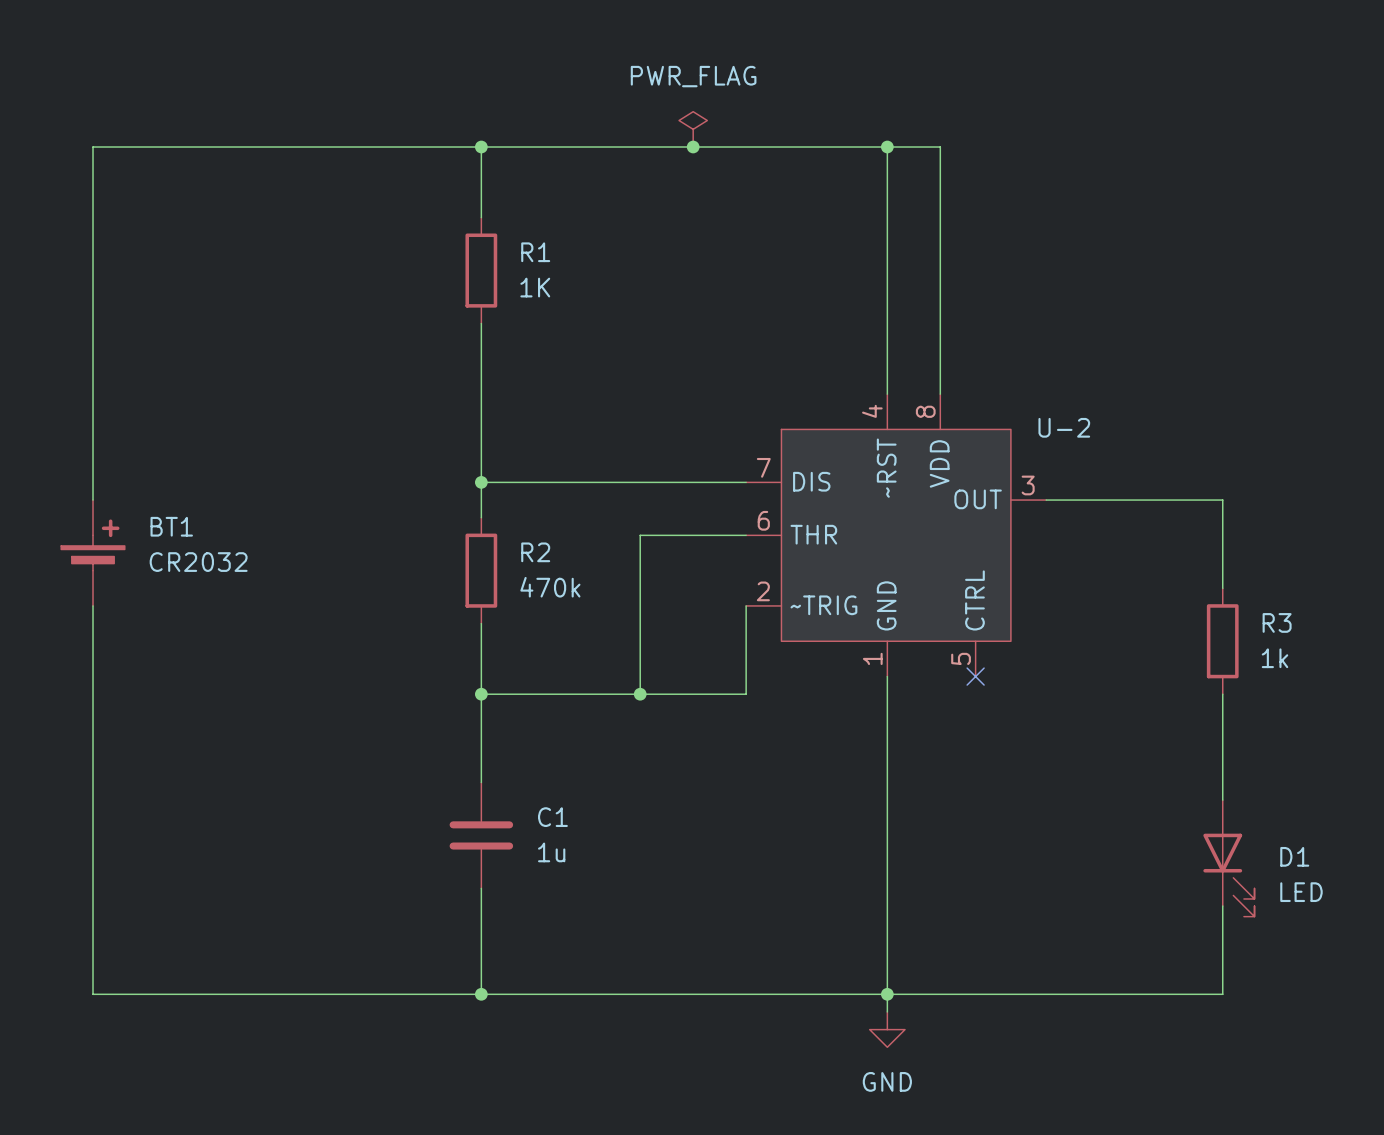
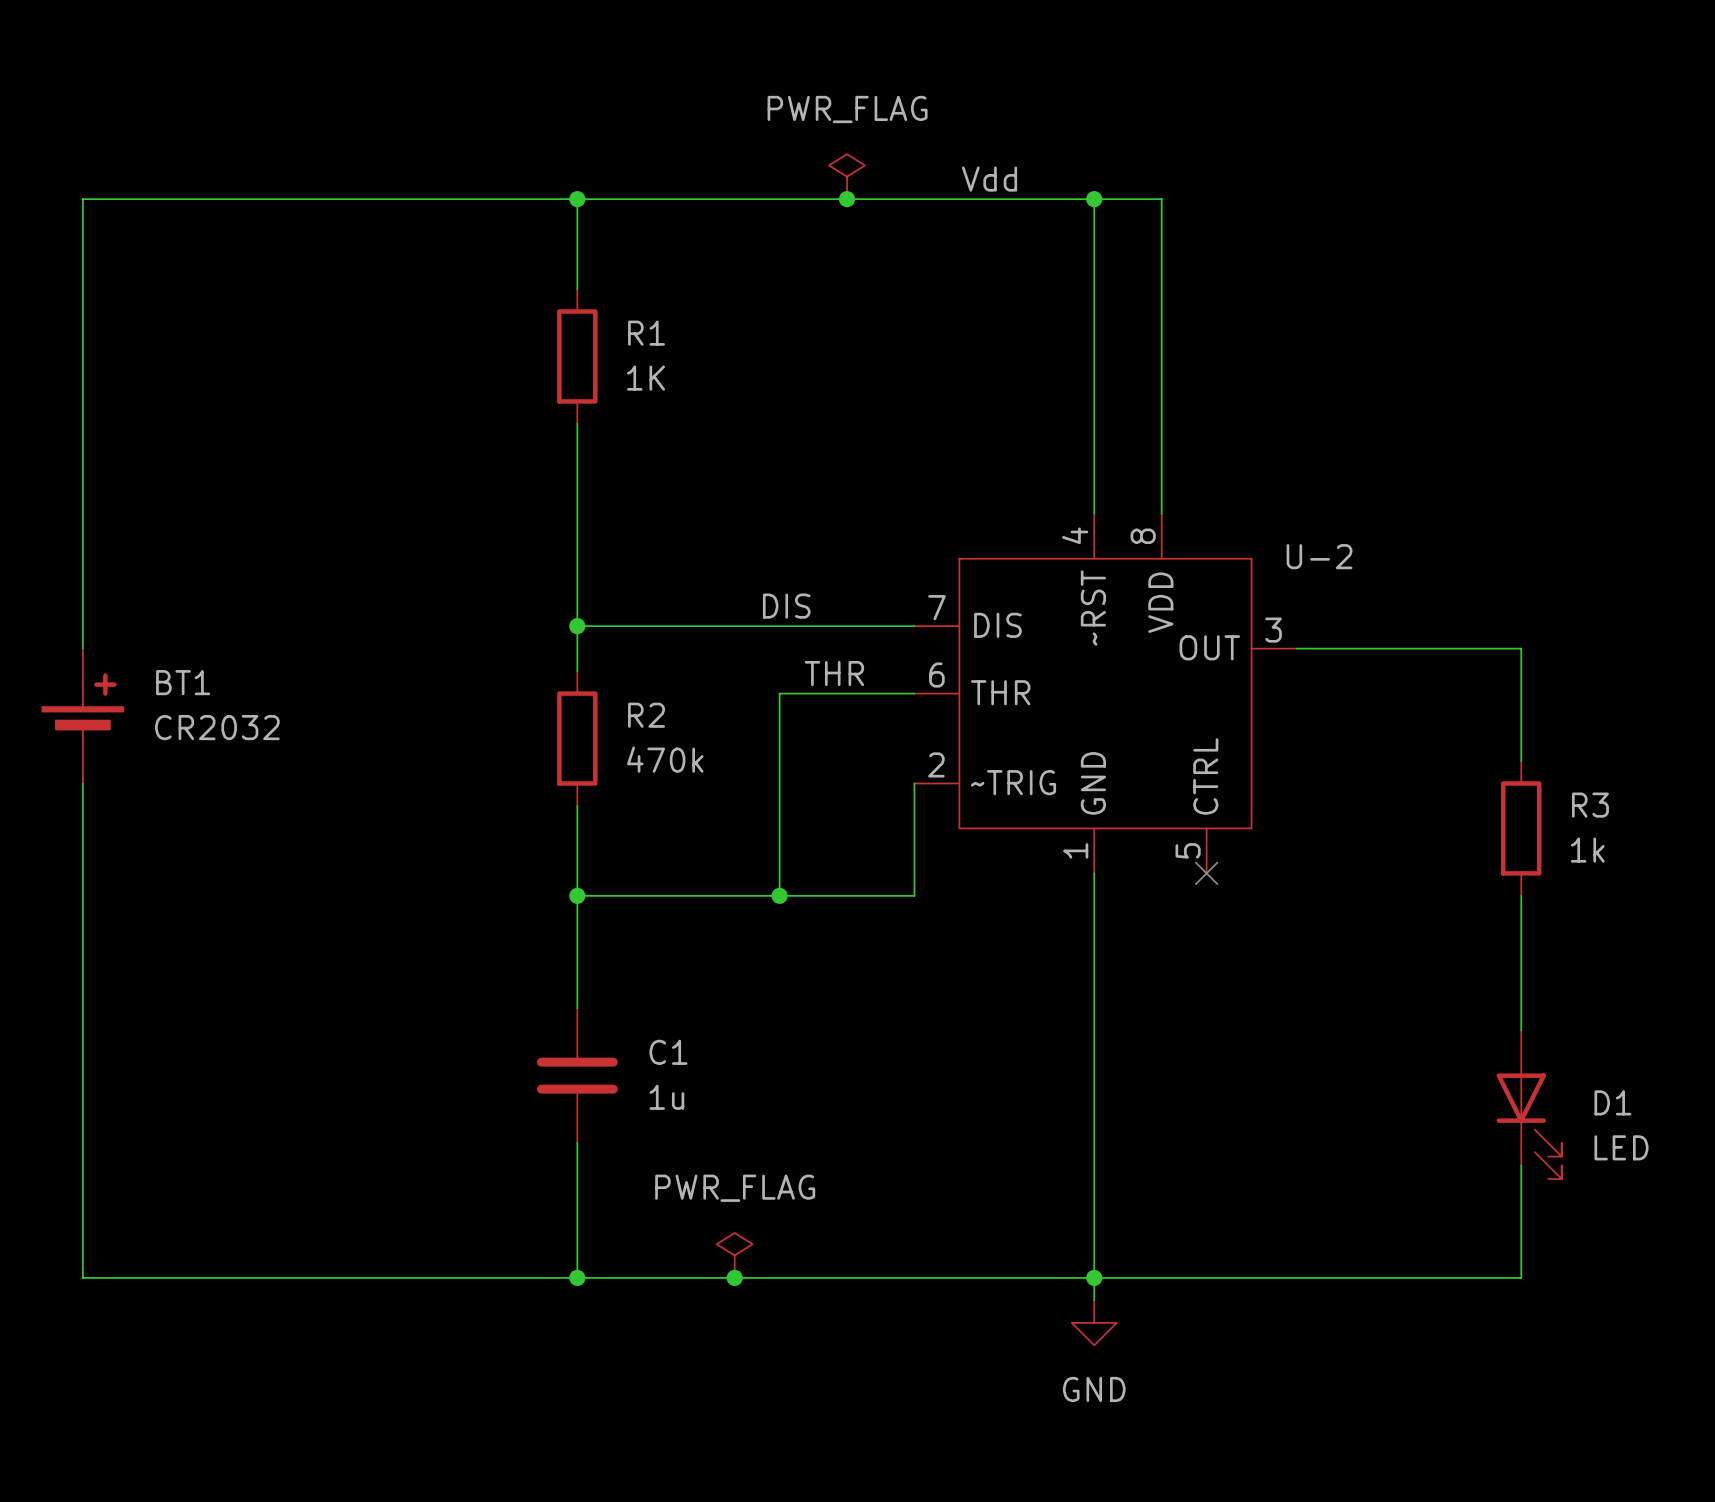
label: none -> Vdd (989, 179)
label: none -> DIS (786, 606)
label: none -> THR (834, 673)
power symbol: none -> PWR_FLAG (734, 1255)
junction: none -> (734, 1277)

